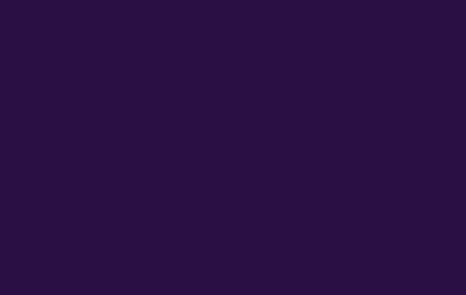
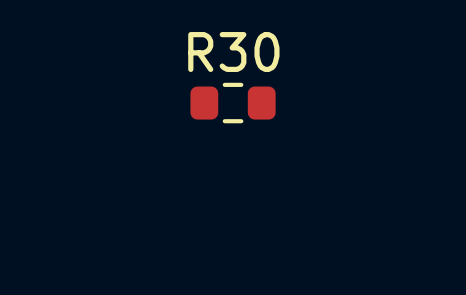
R30: none -> (233, 103)

